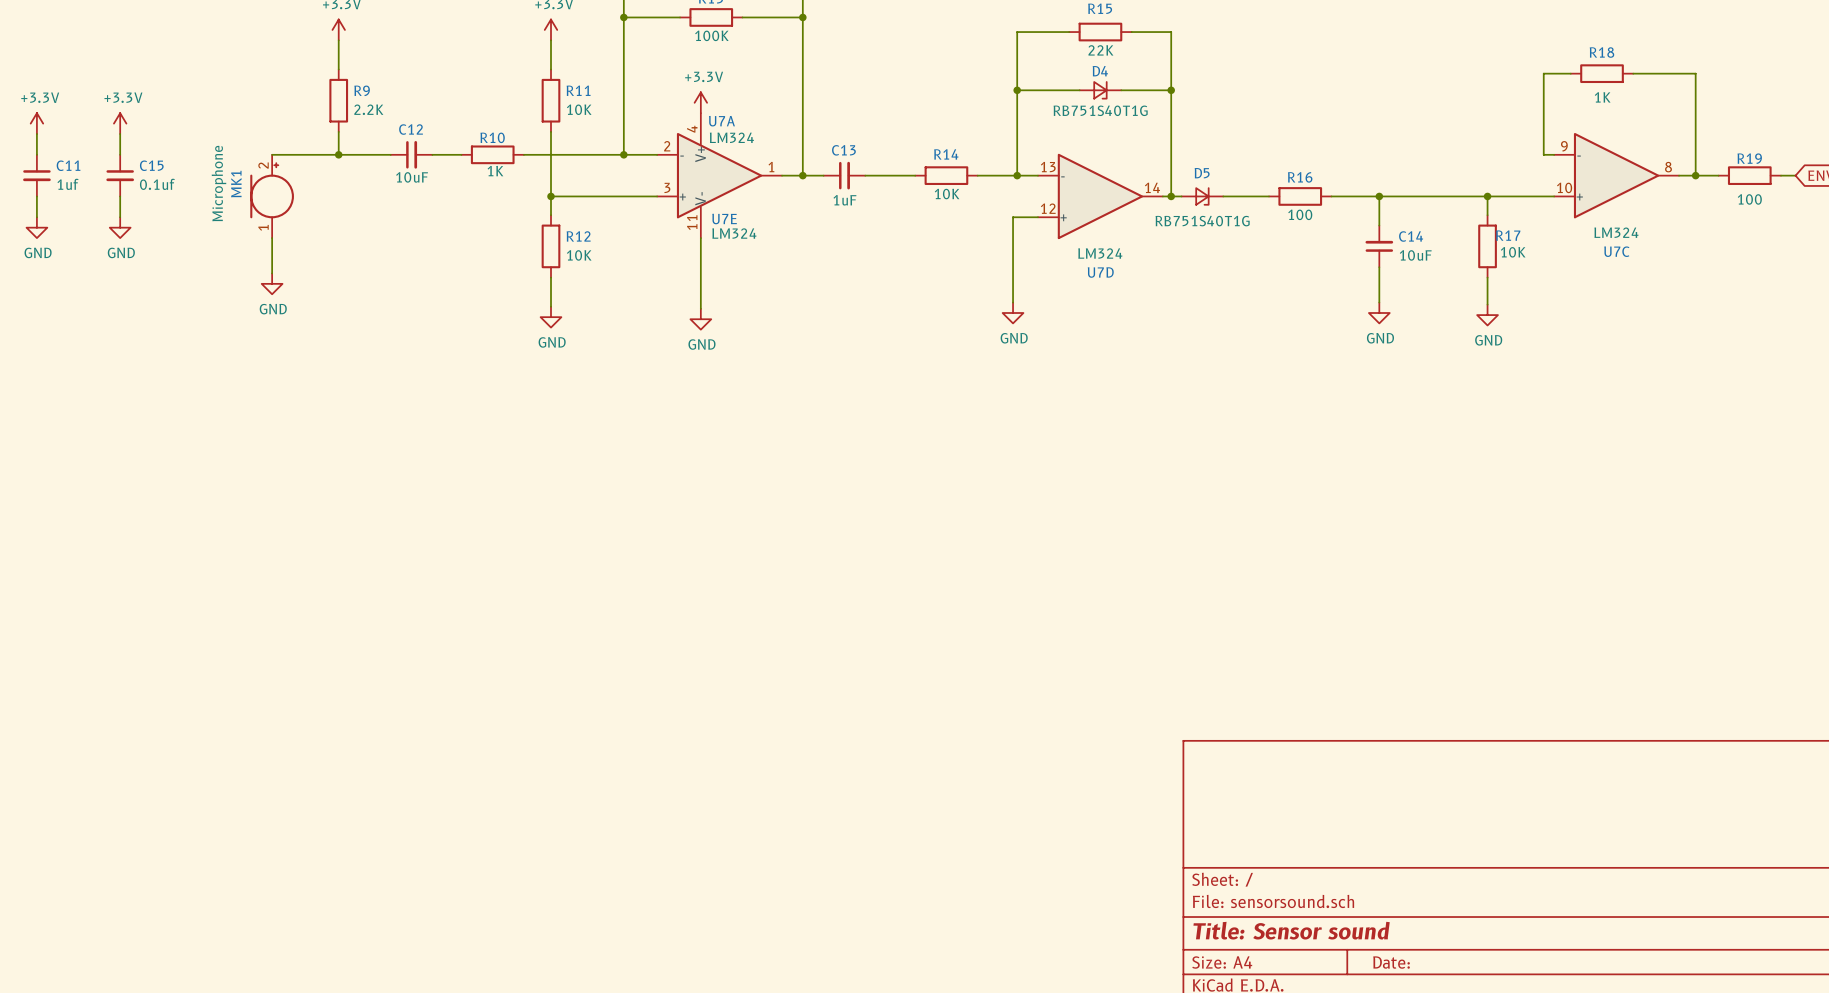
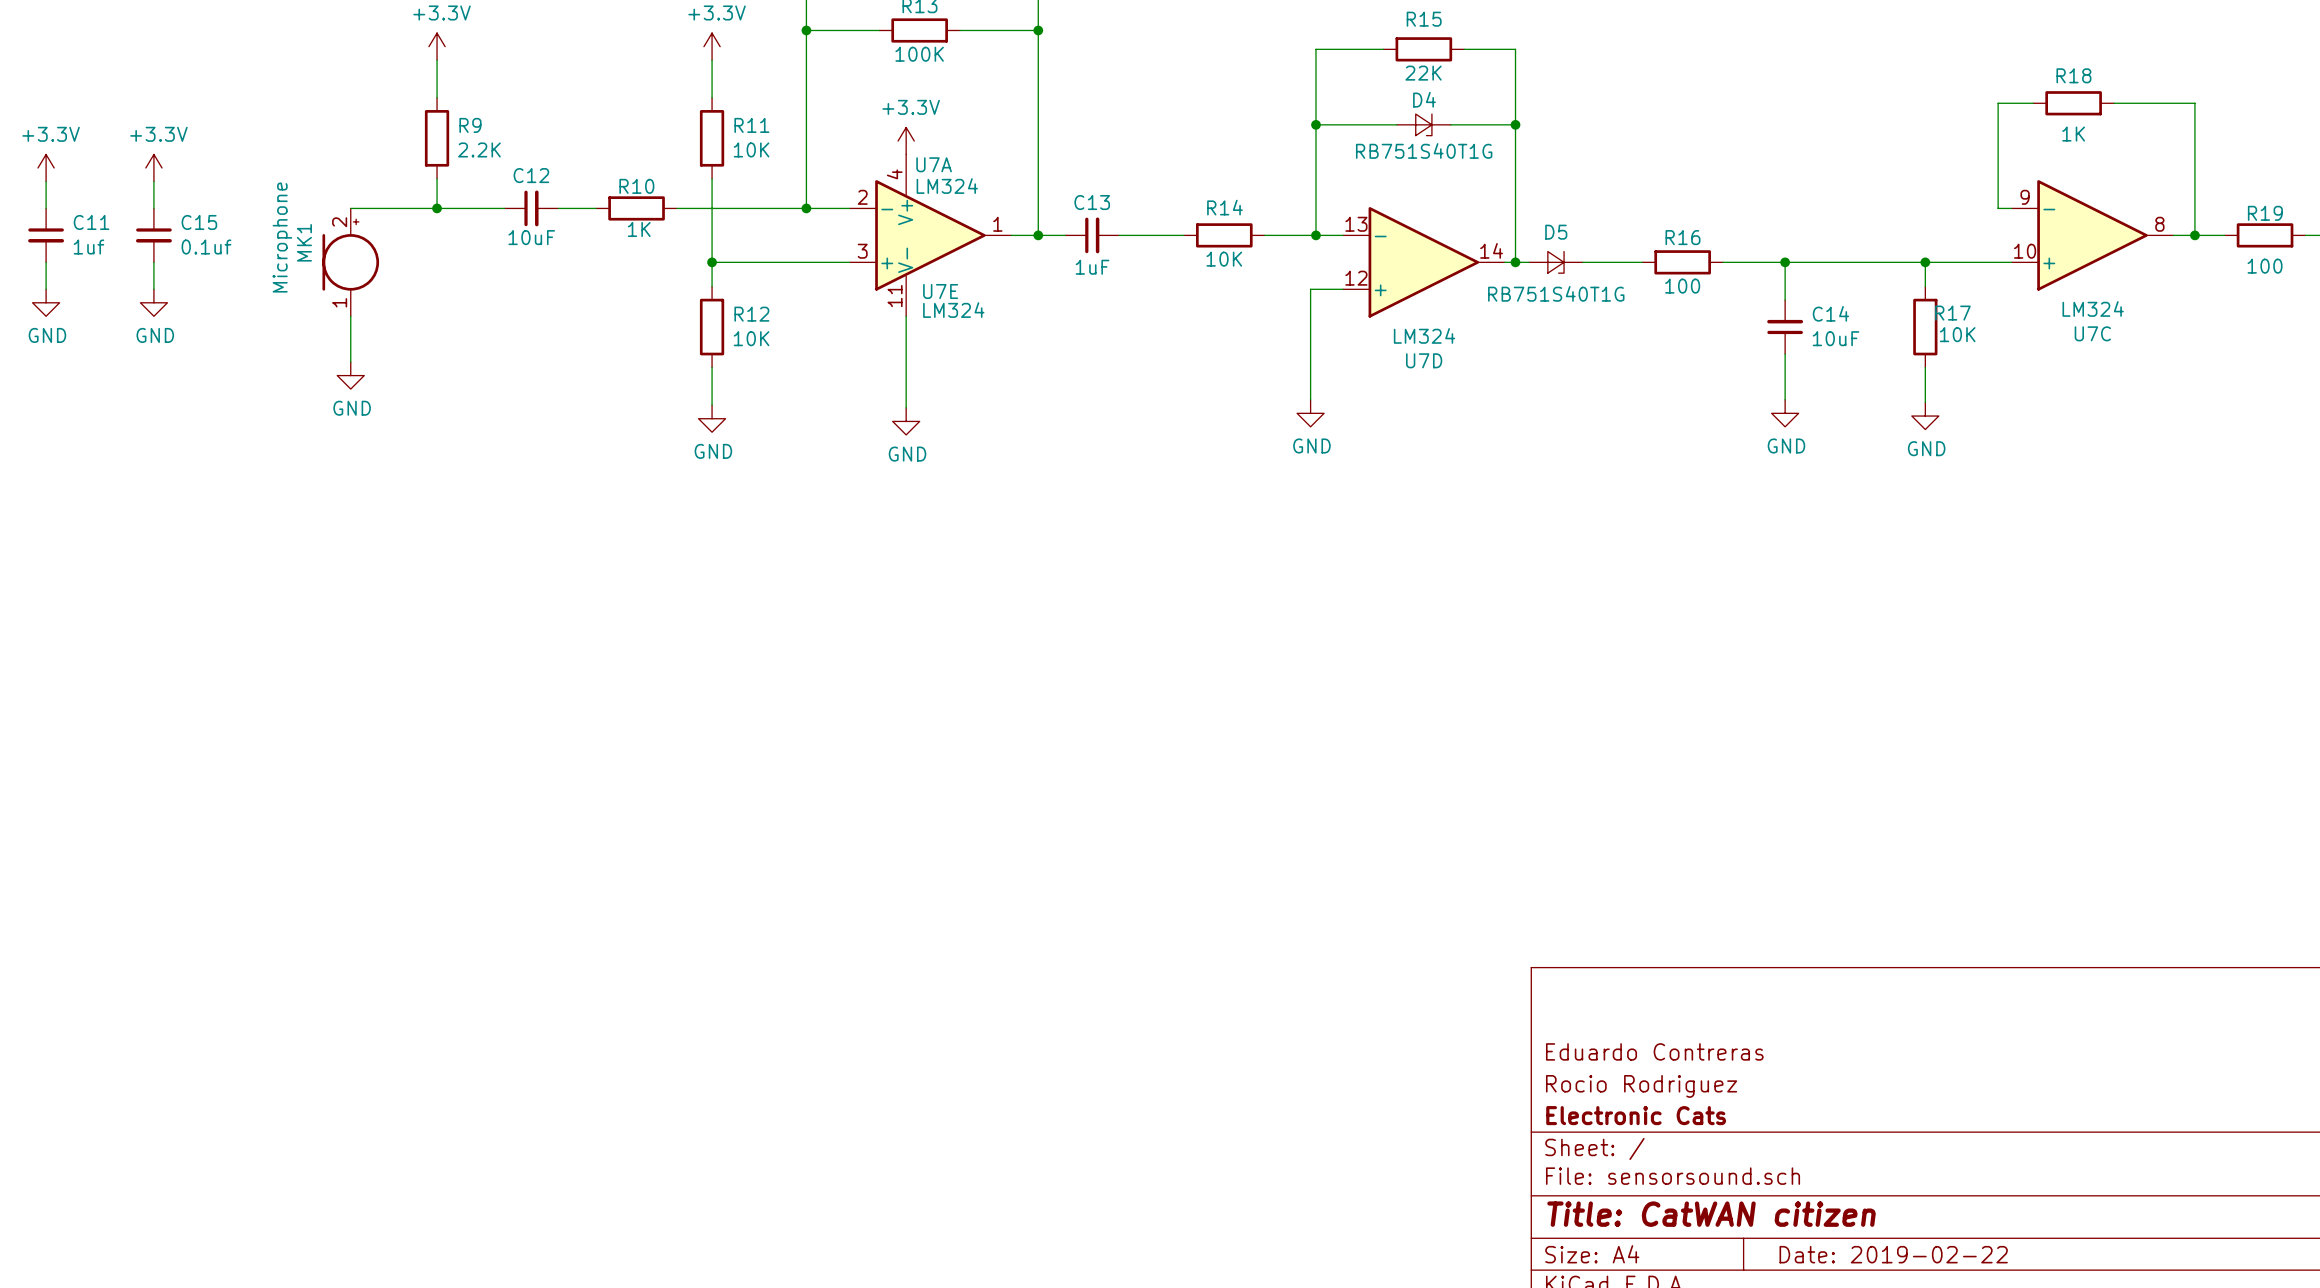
title block: none -> Eduardo Contreras (1654, 1051)
title block: none -> Rocio Rodriguez (1641, 1086)
title block: none -> Electronic Cats (1636, 1115)
title block: Title: Sensor sound (1291, 930) -> Title: CatWAN citizen (1711, 1214)
title block: Date: (1391, 962) -> Date: 2019-02-22 (1893, 1254)

